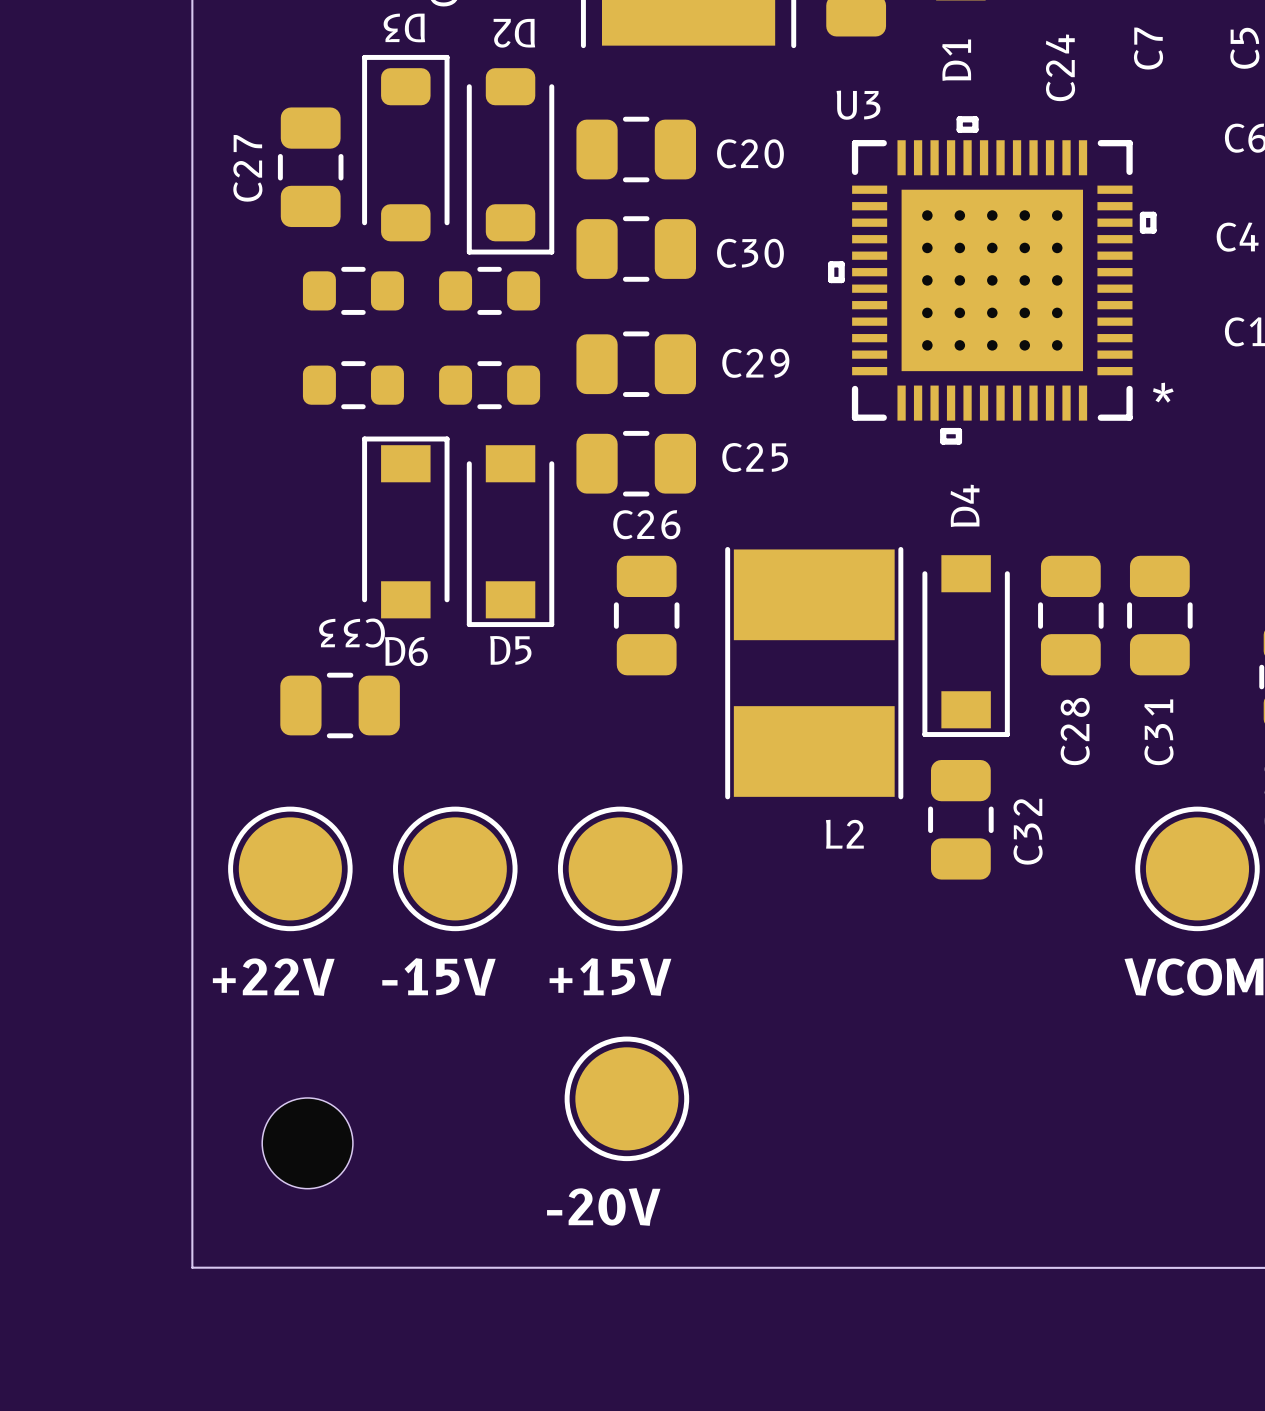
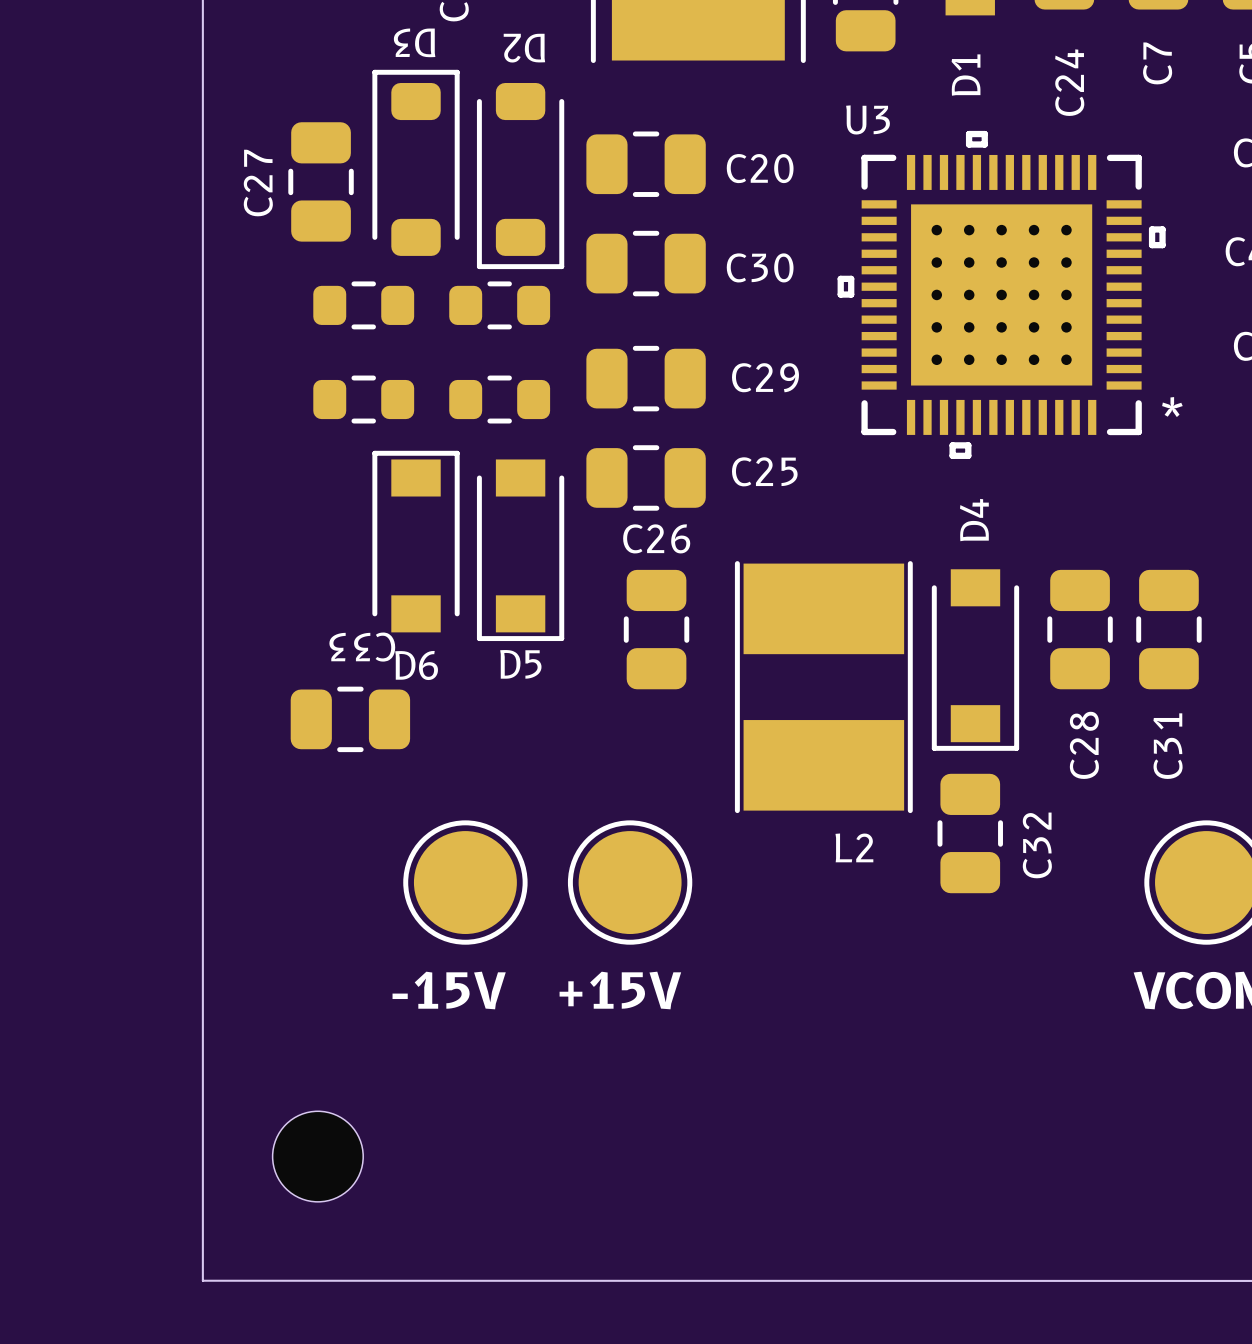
part: (290, 868) -> none
text: +22V (273, 977) -> none
part: (626, 1098) -> none
text: -20V (603, 1206) -> none

